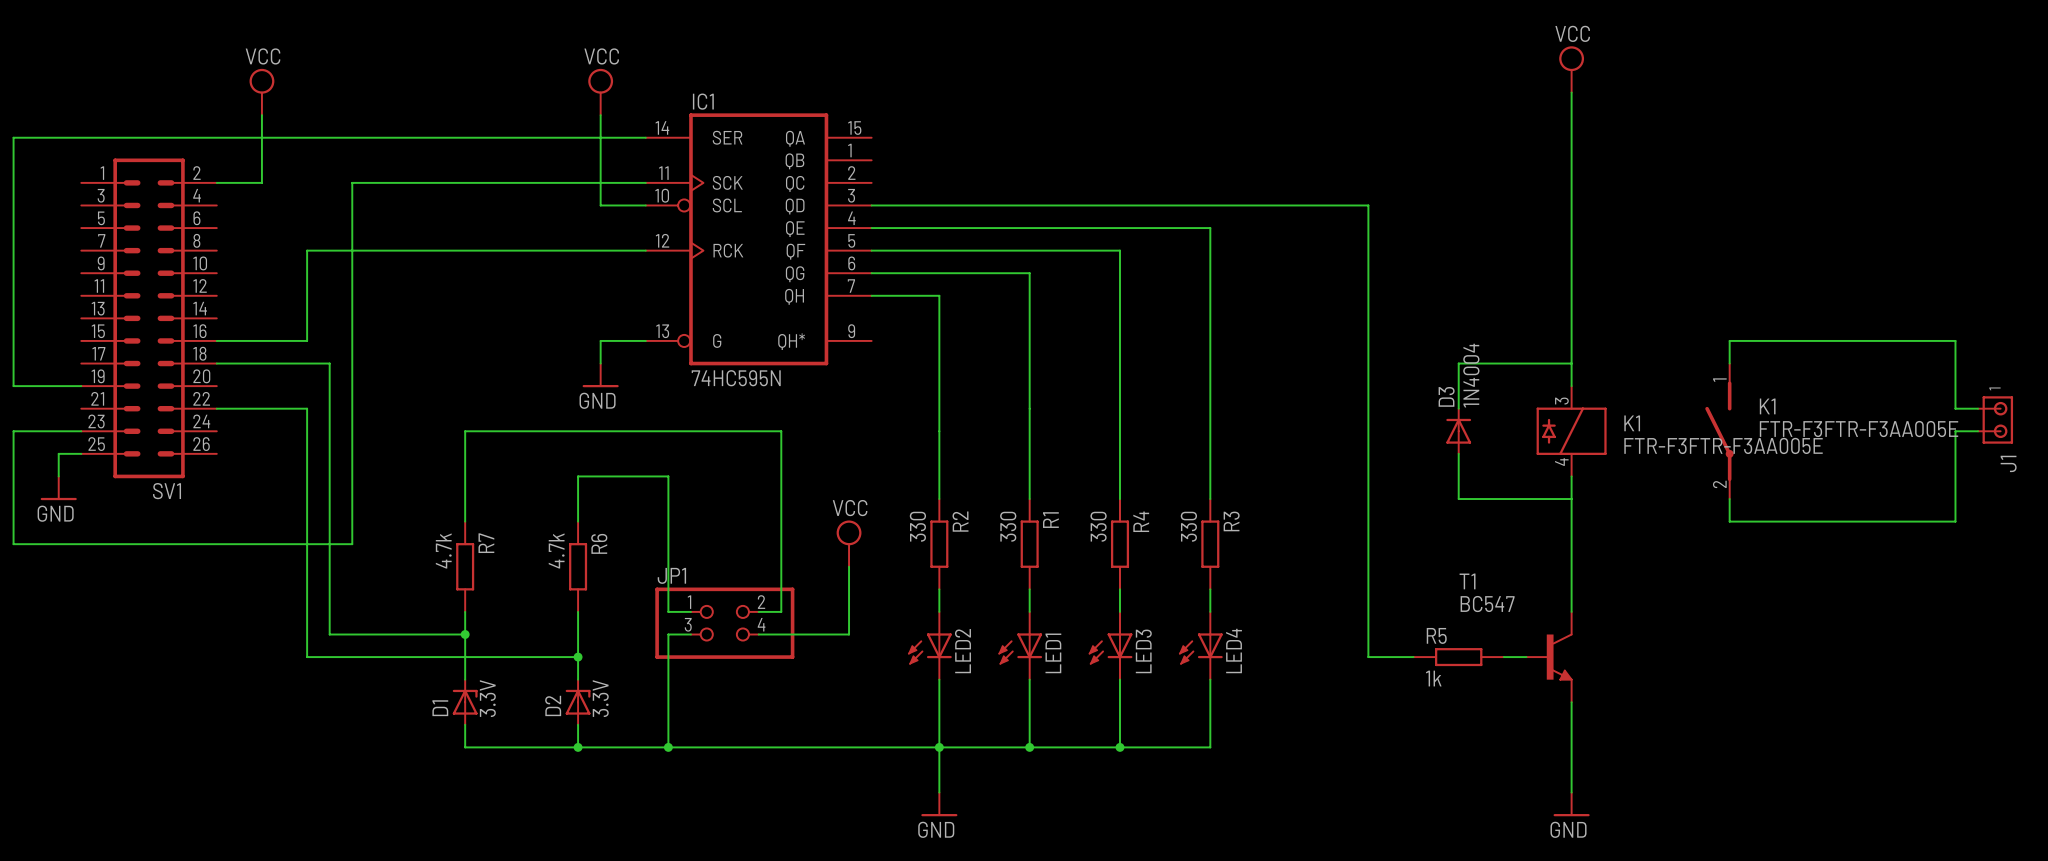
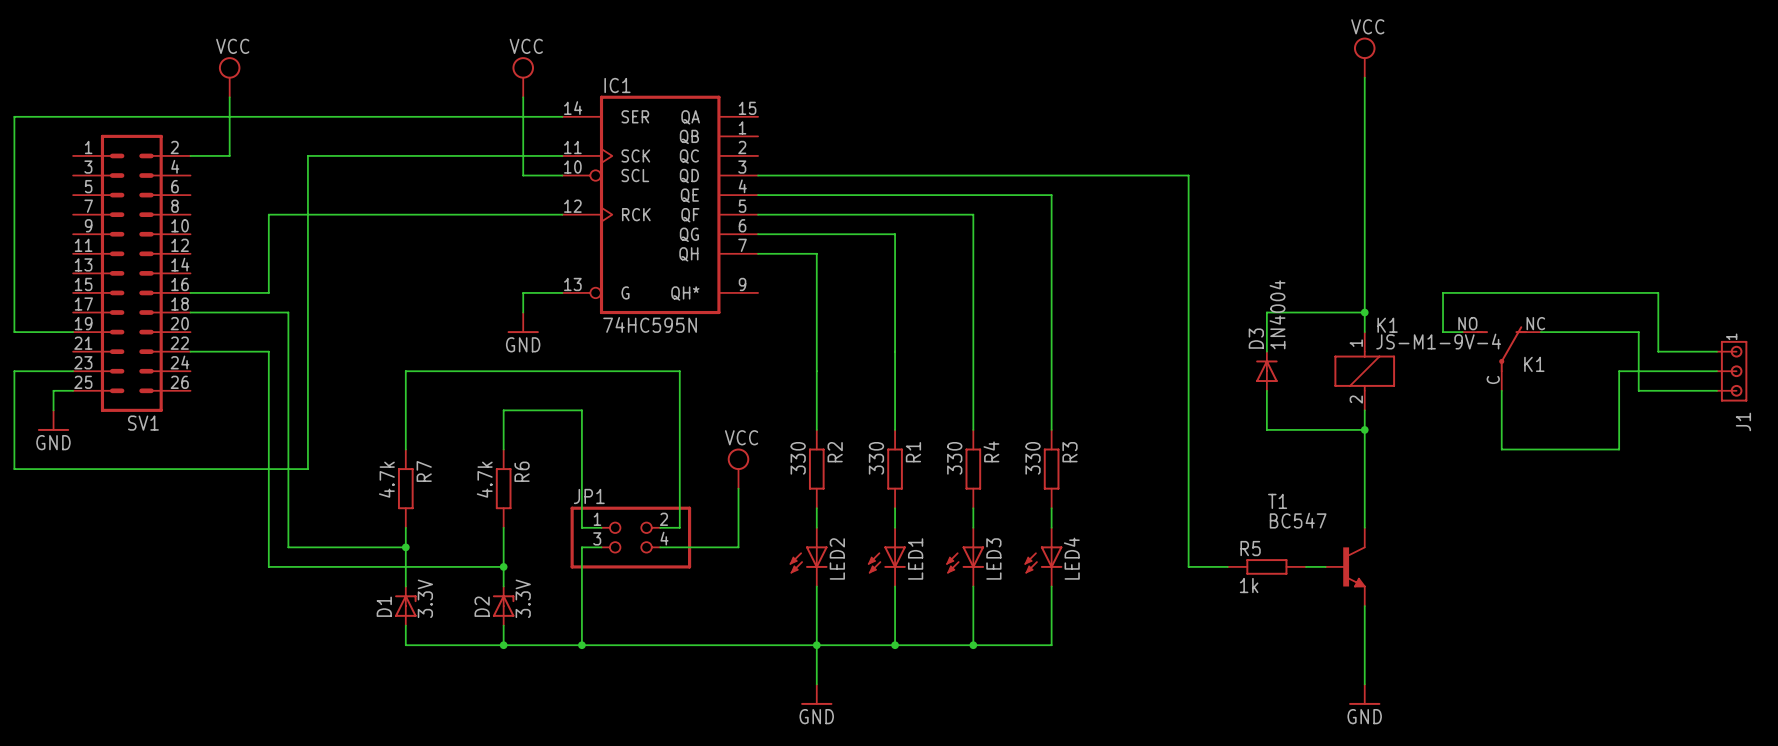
wire: (1729, 340) (1729, 363) -> (1501, 292) (1443, 292) (1443, 332) (1462, 332)
wire: (1910, 340) (1955, 340) (1955, 408) -> (1658, 292) (1658, 351) (1697, 351)
junction: none -> (1364, 312)
K1 symbol: [1536, 386, 1607, 477] -> [1334, 332, 1396, 411]
wire: none -> (1540, 332) (1638, 332) (1638, 390) (1717, 390)
J1 symbol: [1978, 396, 2014, 444] -> [1717, 340, 1748, 402]
K1: none -> (1501, 358)
K1 name position: K1 (1632, 423) -> K1 (1387, 325)
K1: FTR-F3FTR-F3AA005E (1719, 431) -> none
wire: (1955, 431) (1955, 521) (1865, 521) -> (1697, 371) (1619, 371) (1619, 449)
K1 value: FTR-F3FTR-F3AA005E (1723, 445) -> JS-M1-9V-4 (1438, 341)
junction: none -> (1364, 429)

